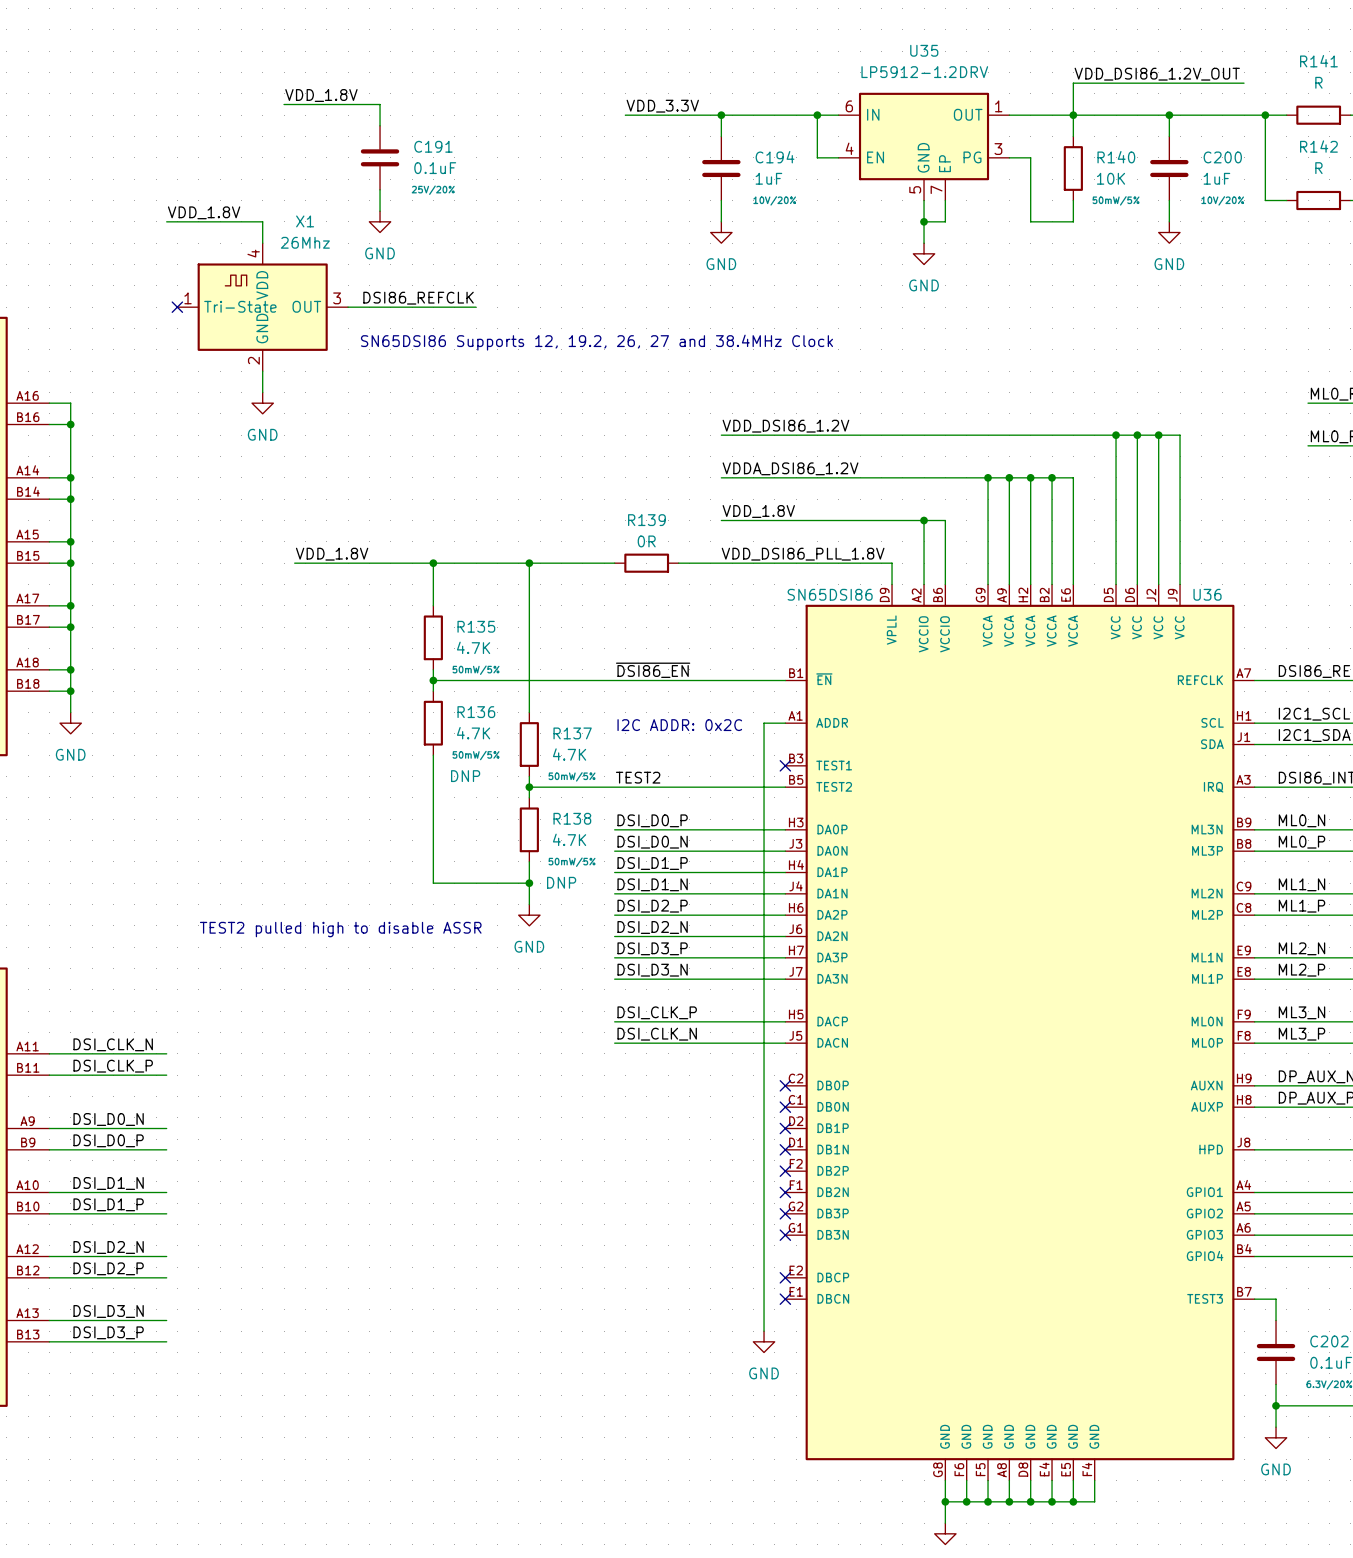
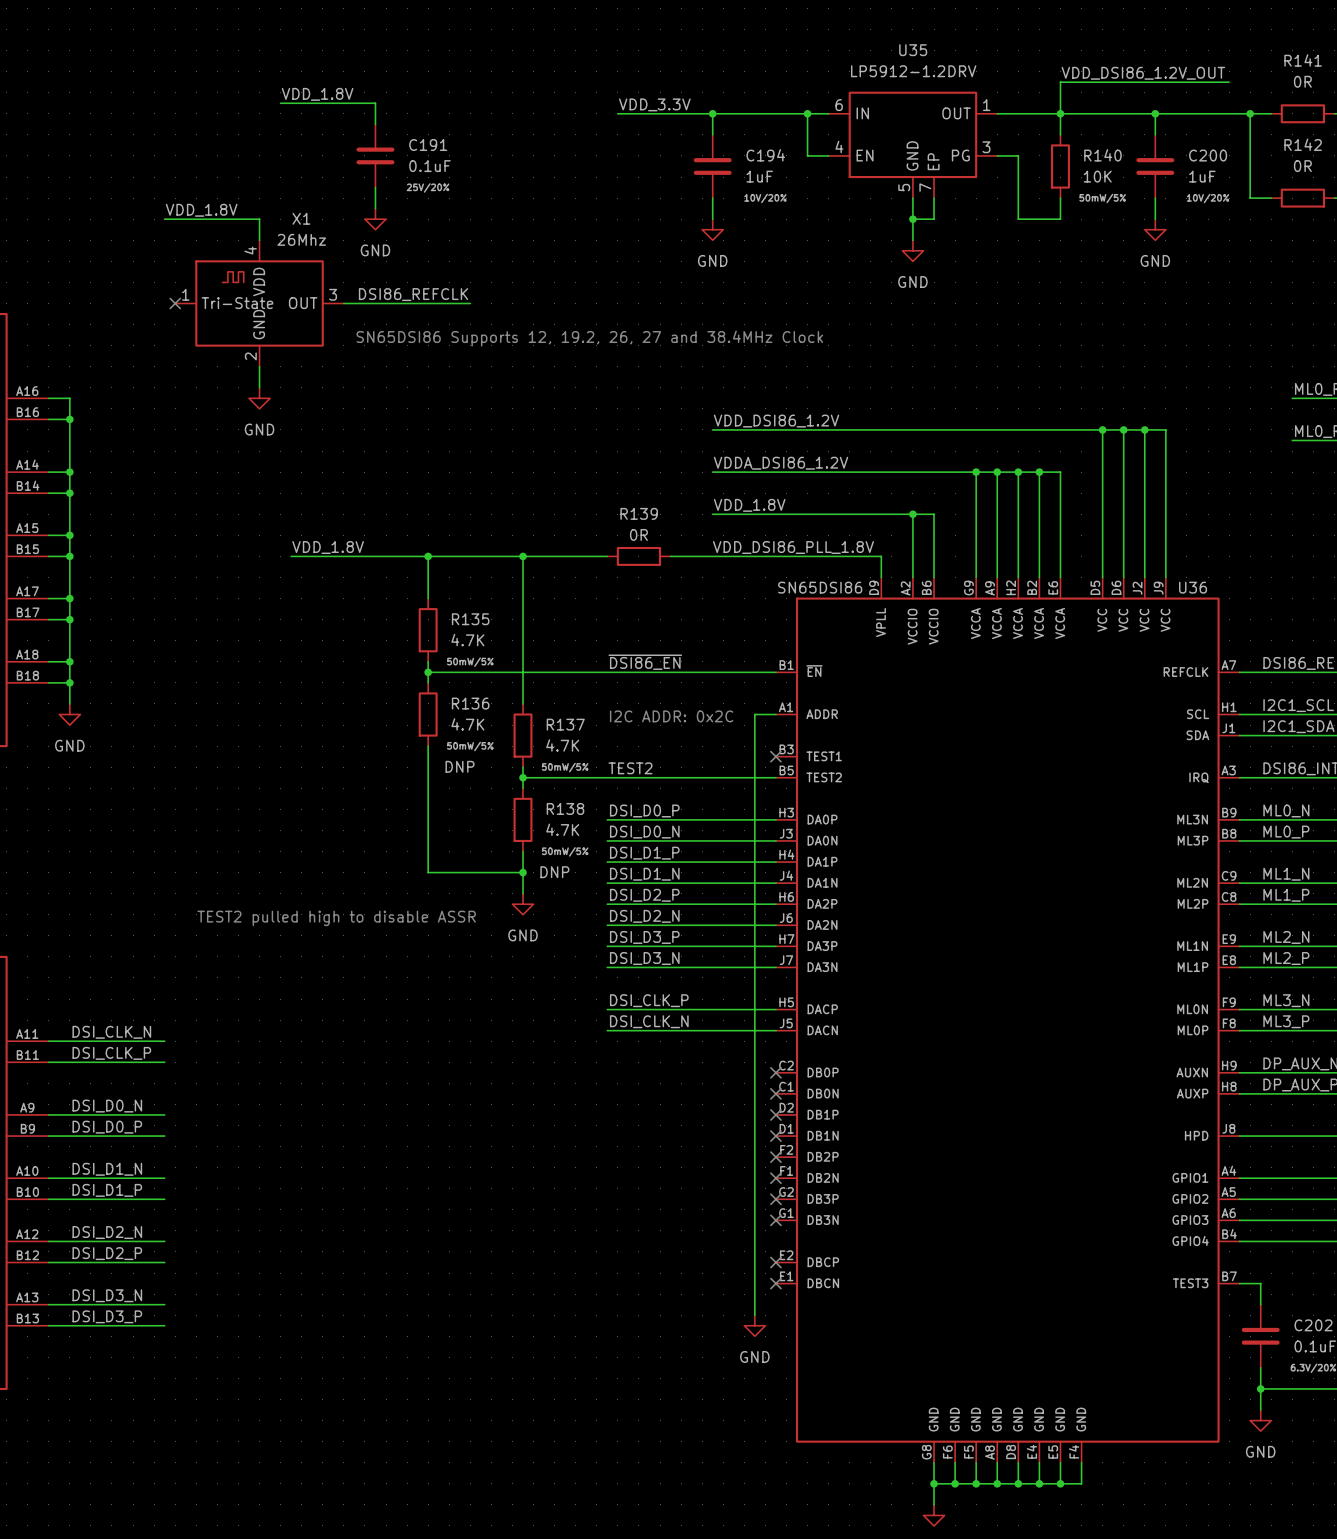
R141 value: R (1318, 82) -> 0R (1302, 81)
R142 value: R (1318, 168) -> 0R (1302, 166)

